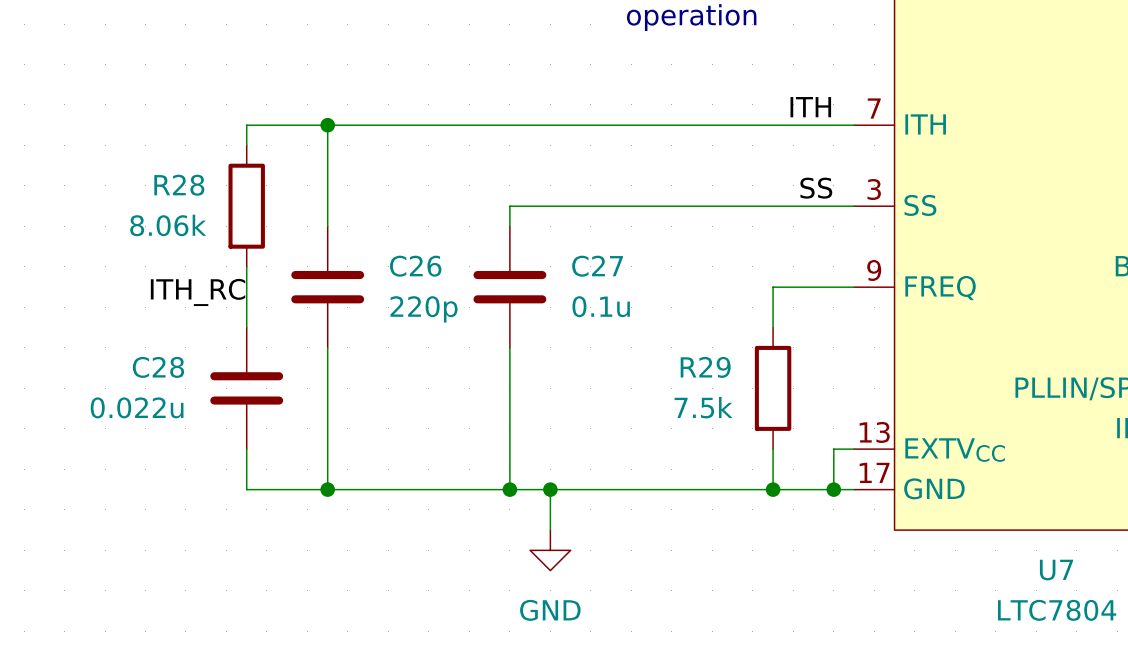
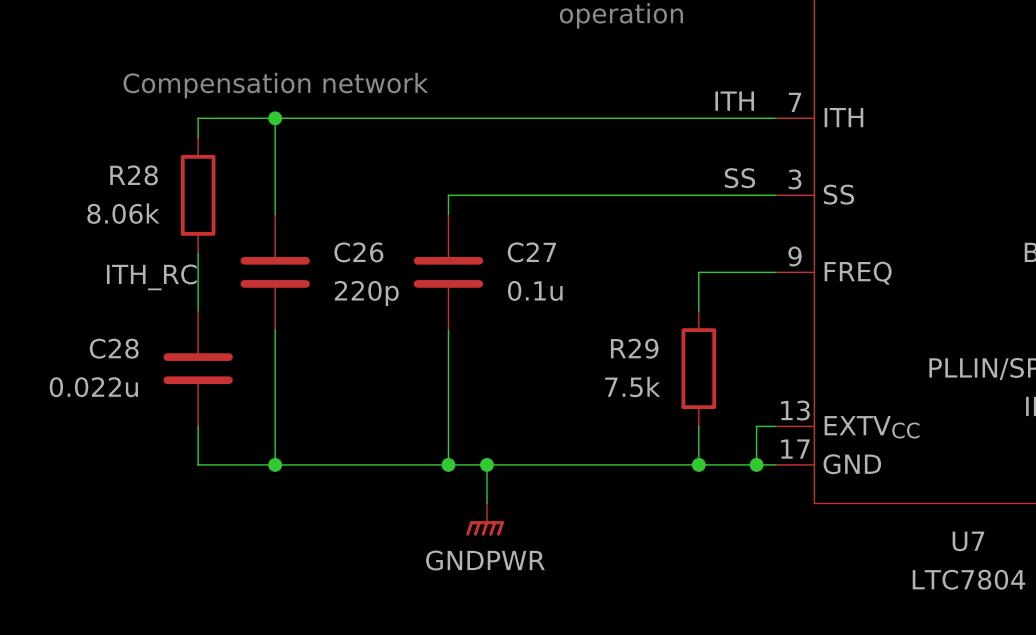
text: none -> Compensation network (275, 85)
power symbol: GND (550, 550) -> GNDPWR (485, 519)

